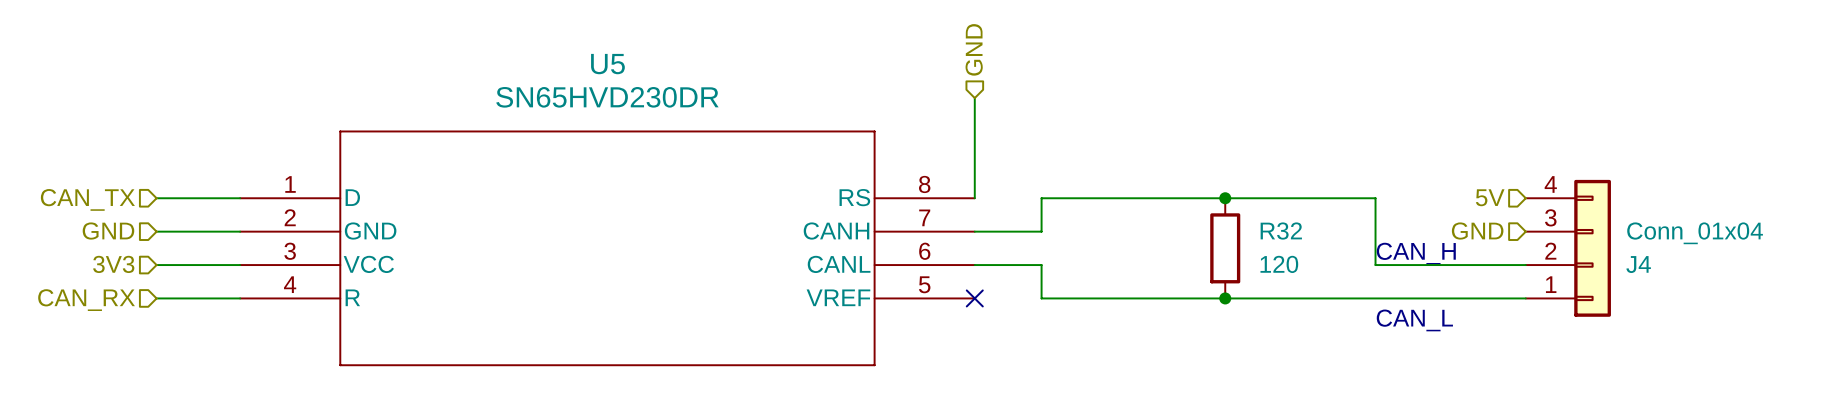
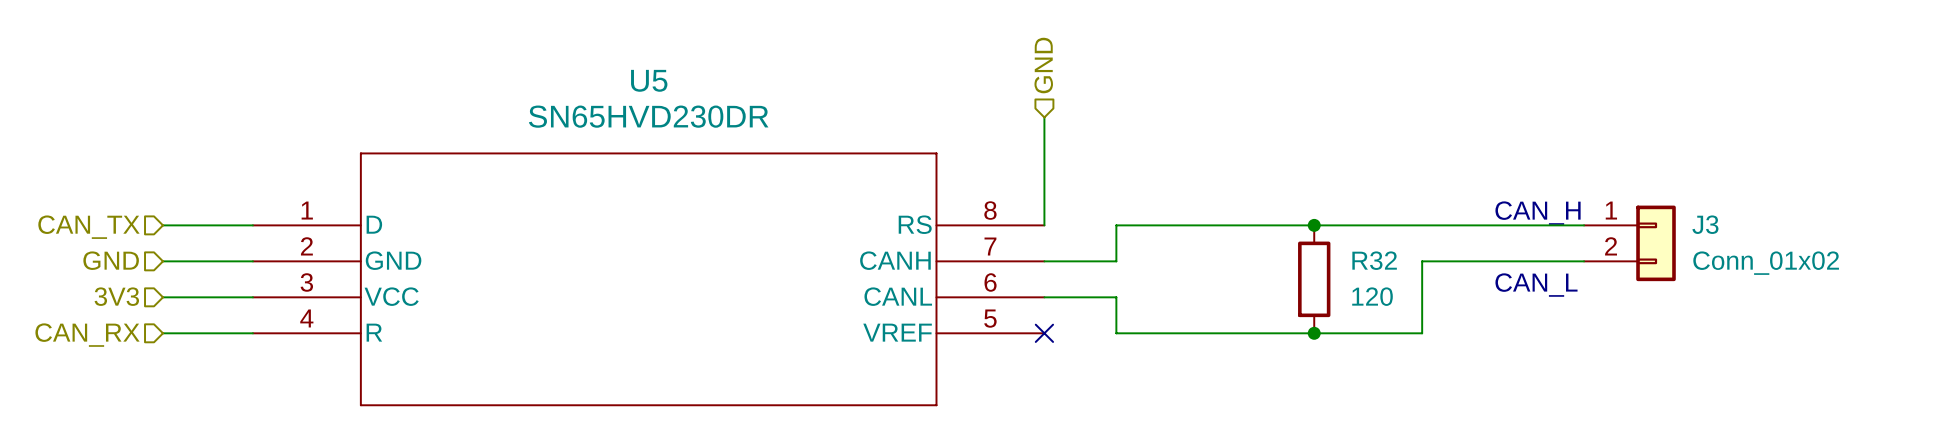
hierarchical label: 5V (1490, 197) -> none
wire: (1375, 198) (1375, 265) (1525, 265) -> (1476, 225) (1584, 225)
J3: none -> Conn_01x02 (1629, 243)
hierarchical label: GND (1477, 231) -> none
J4: Conn_01x04 (1568, 248) -> none
text position: CAN_H (1416, 253) -> CAN_H (1538, 213)
wire: (1325, 298) (1525, 298) -> (1422, 333) (1422, 261) (1584, 261)
text position: CAN_L (1414, 320) -> CAN_L (1536, 285)

